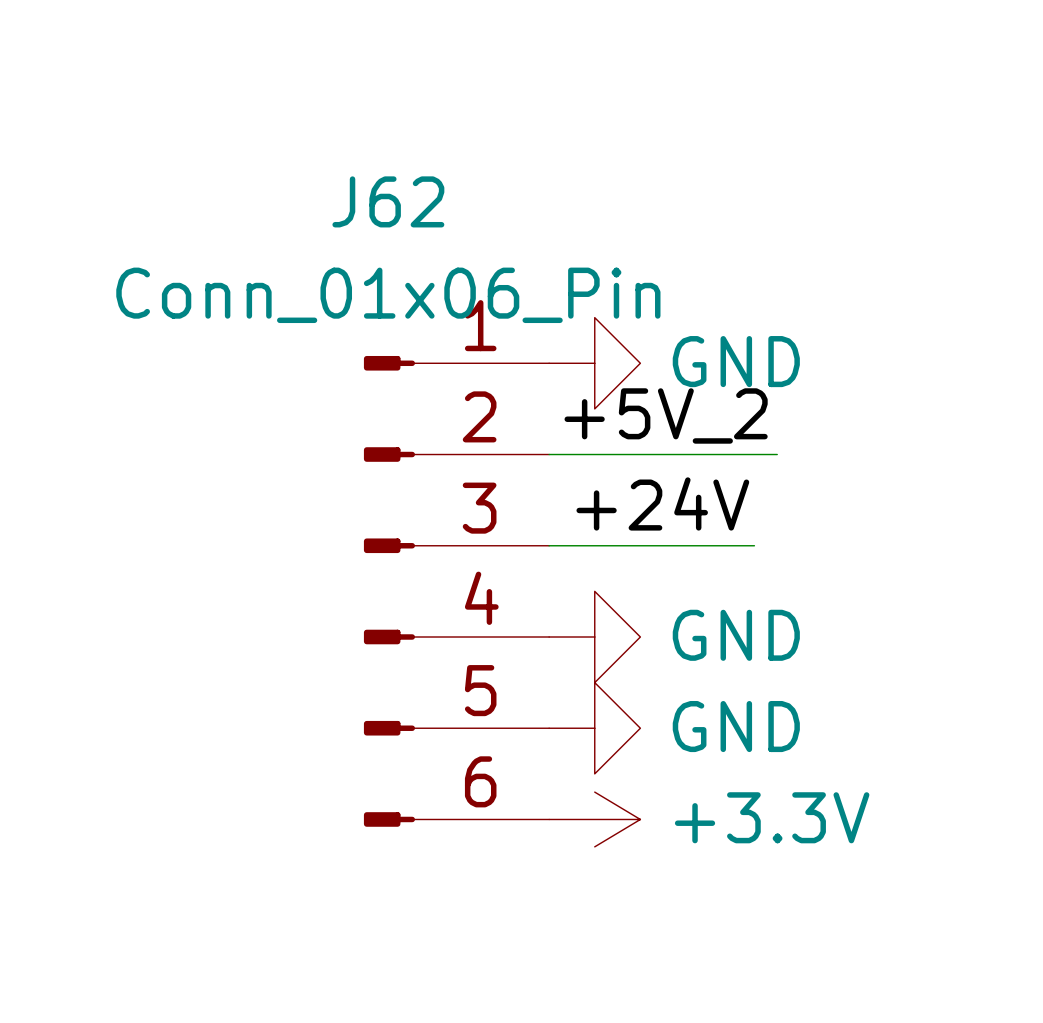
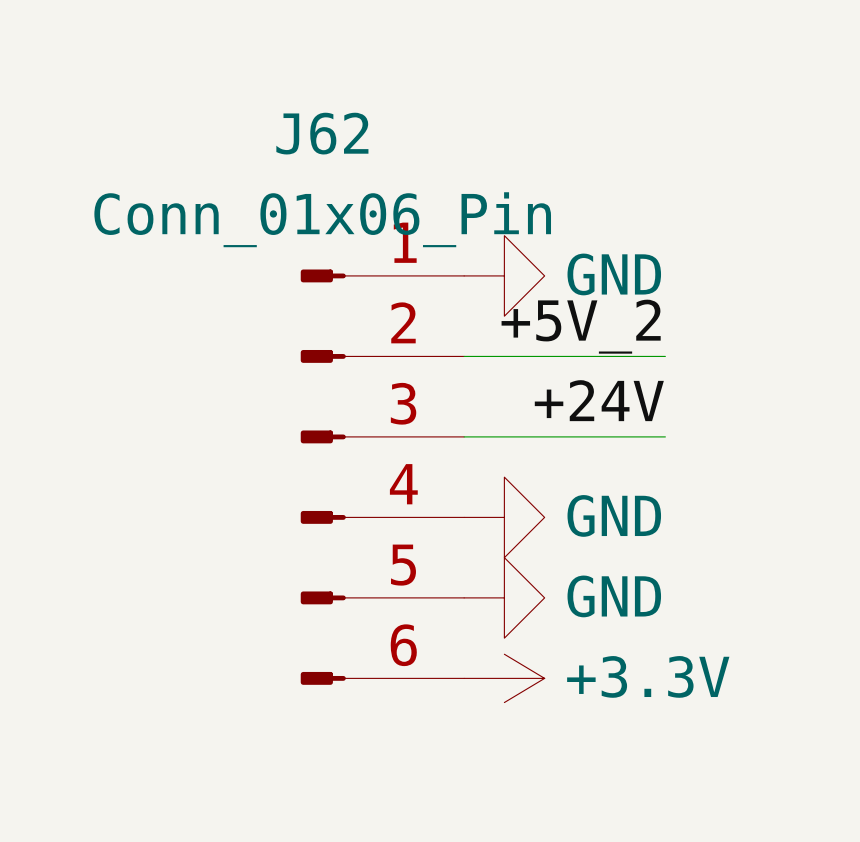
label position: +24V (662, 503) -> +24V (599, 400)
wire: none -> (645, 436) (665, 436)

